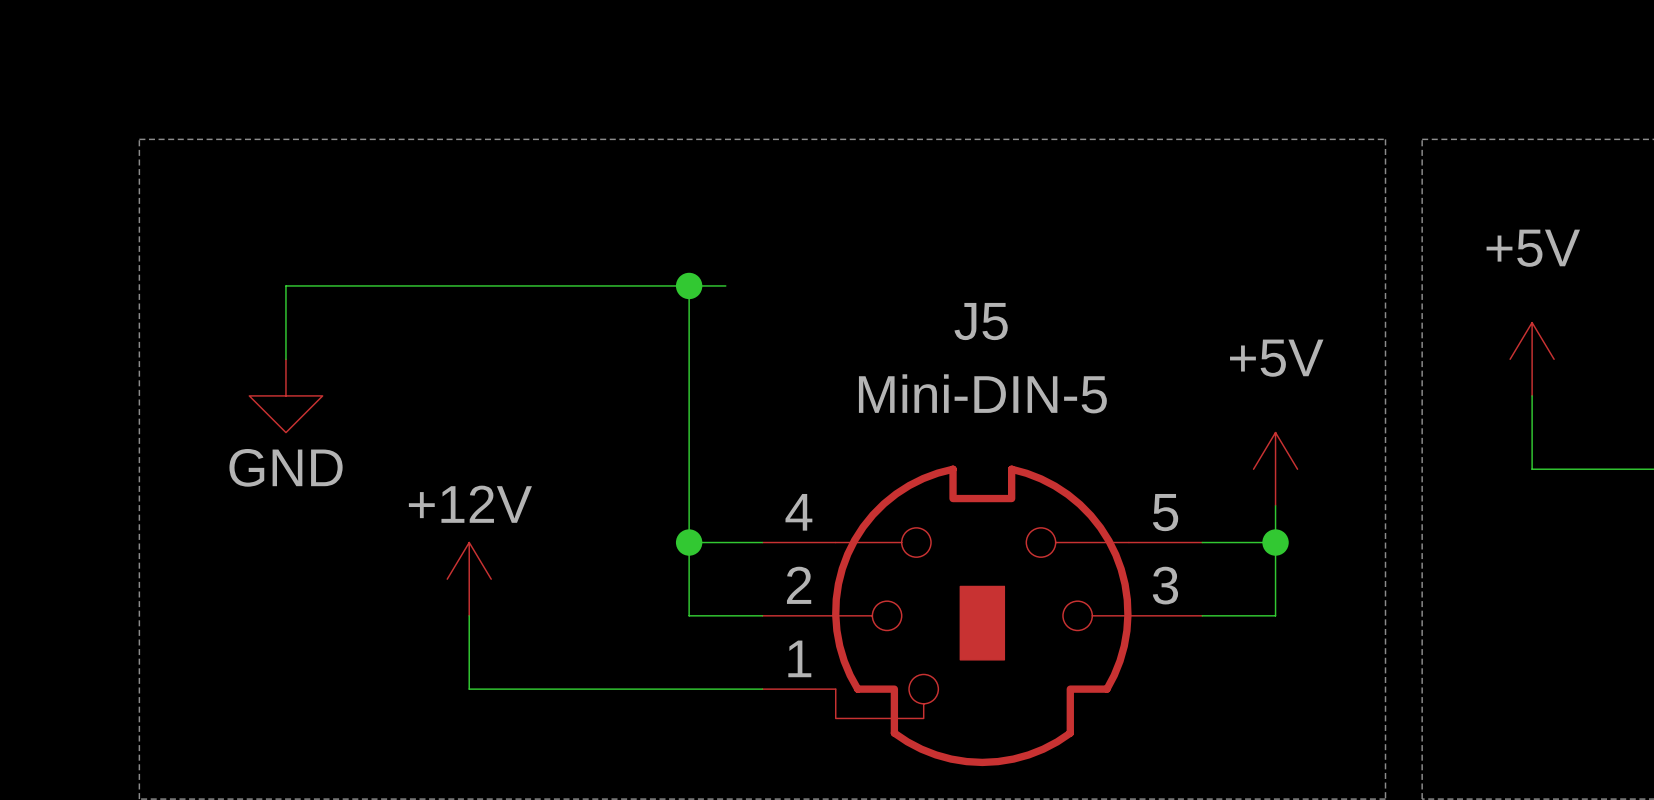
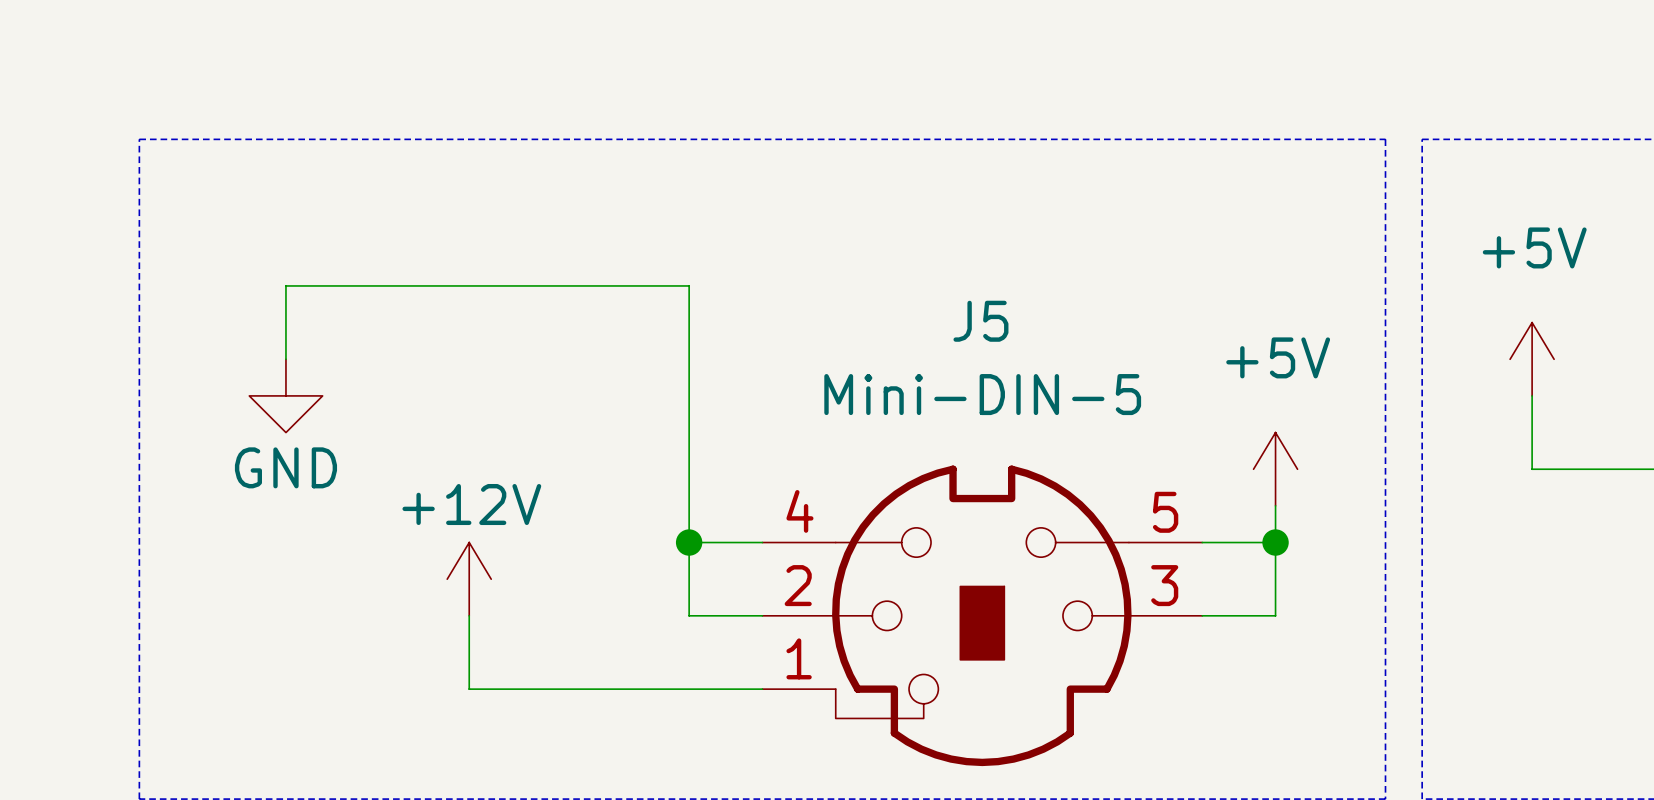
wire: (689, 285) (725, 285) -> none
junction: (689, 285) -> none

